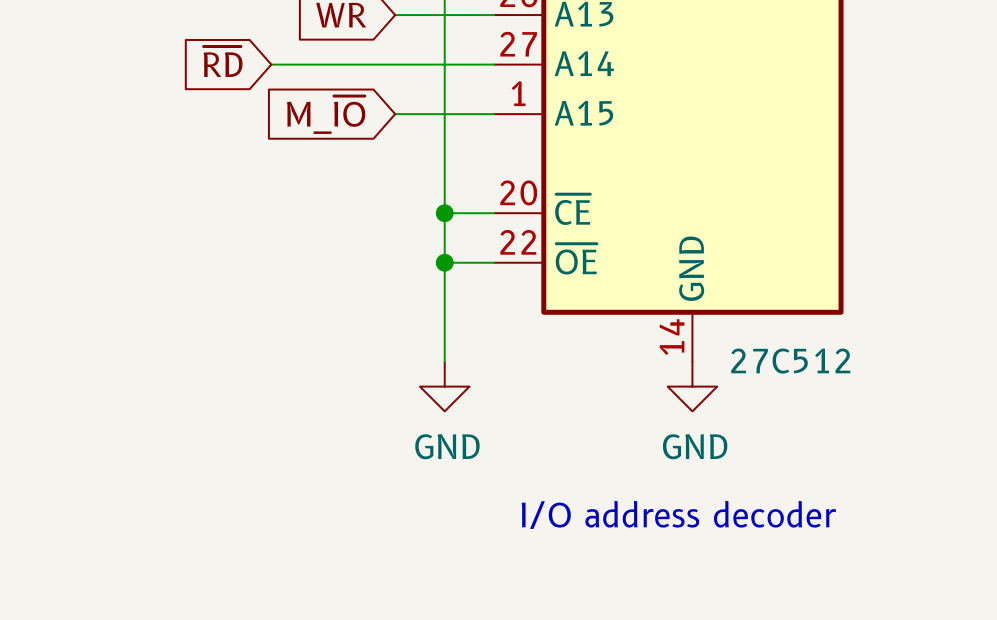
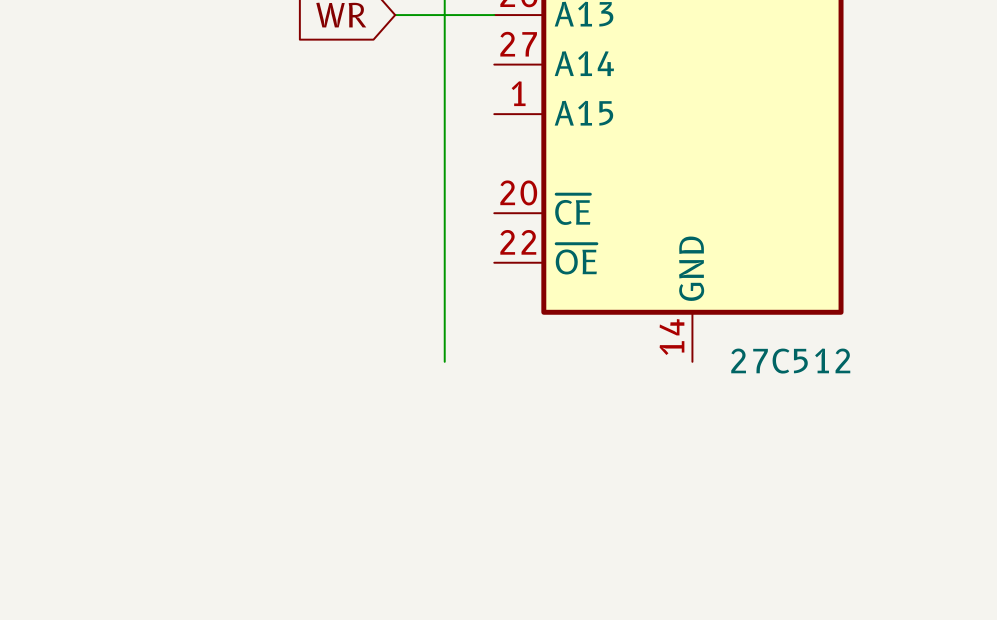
global label: ~{RD} (223, 61) -> none
wire: (271, 64) (494, 64) -> none
global label: M_~{IO} (326, 114) -> none
wire: (395, 114) (494, 114) -> none
wire: (444, 213) (494, 213) -> none
junction: (444, 213) -> none
wire: (444, 262) (494, 262) -> none
junction: (444, 262) -> none
power symbol: GND (444, 386) -> none
power symbol: GND (692, 386) -> none
text: I/O address decoder (678, 514) -> none

